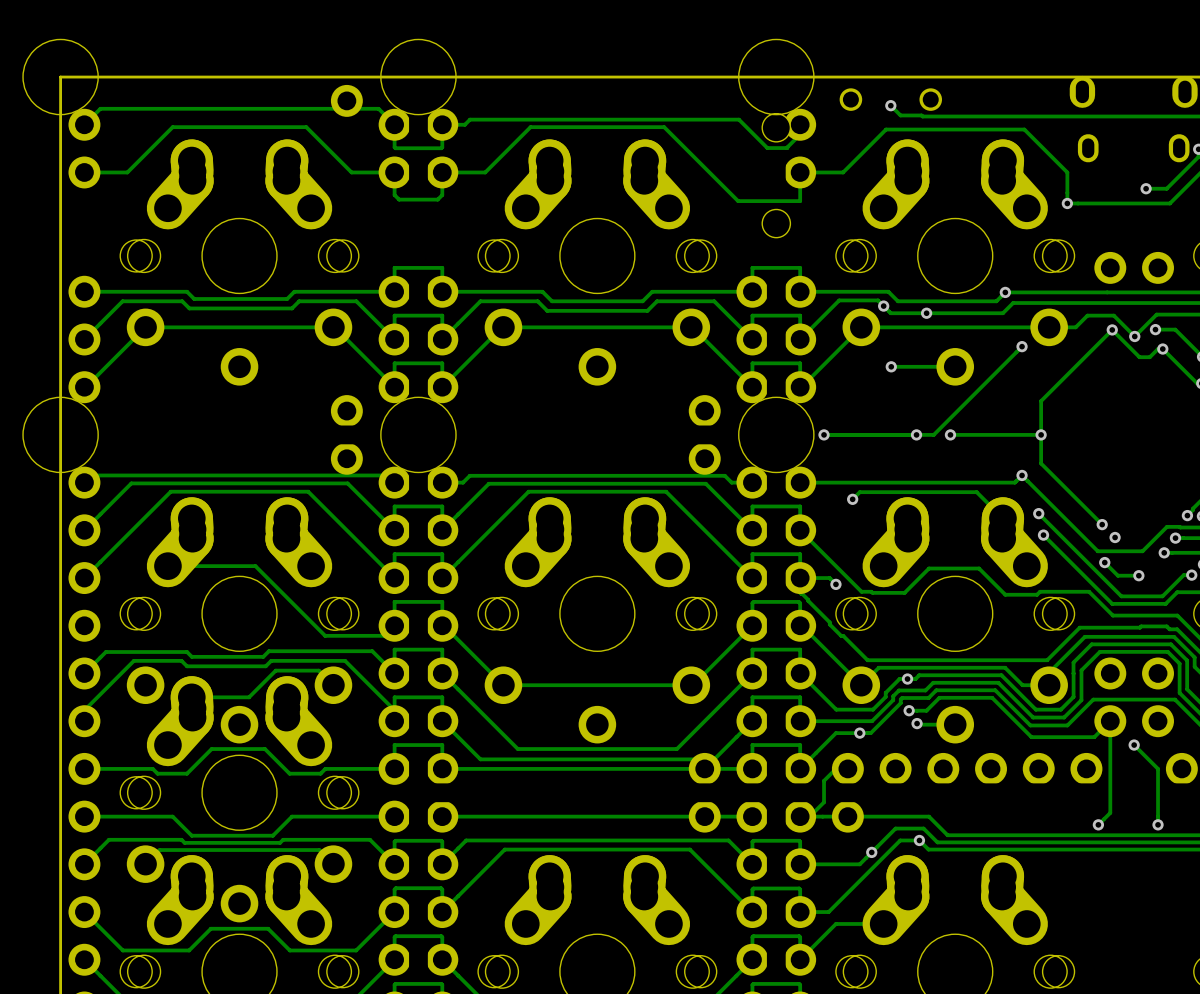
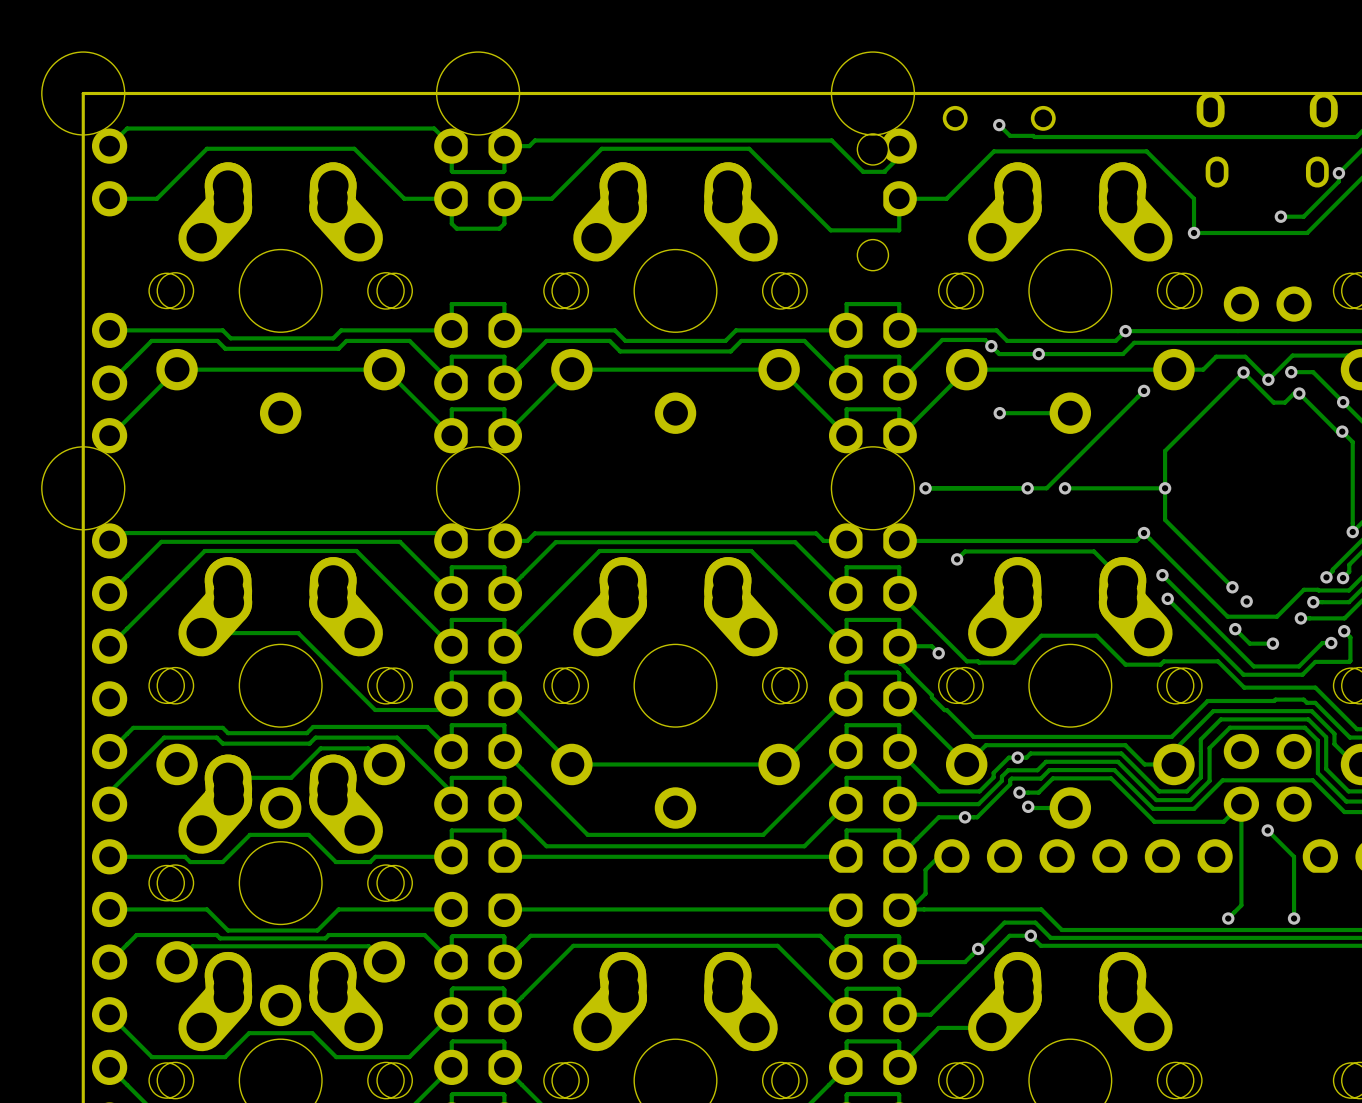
part: (346, 100) -> none
part: (346, 411) -> none
part: (704, 411) -> none
part: (346, 458) -> none
part: (704, 458) -> none
part: (704, 768) -> none
part: (704, 816) -> none
part: (847, 816) -> none

